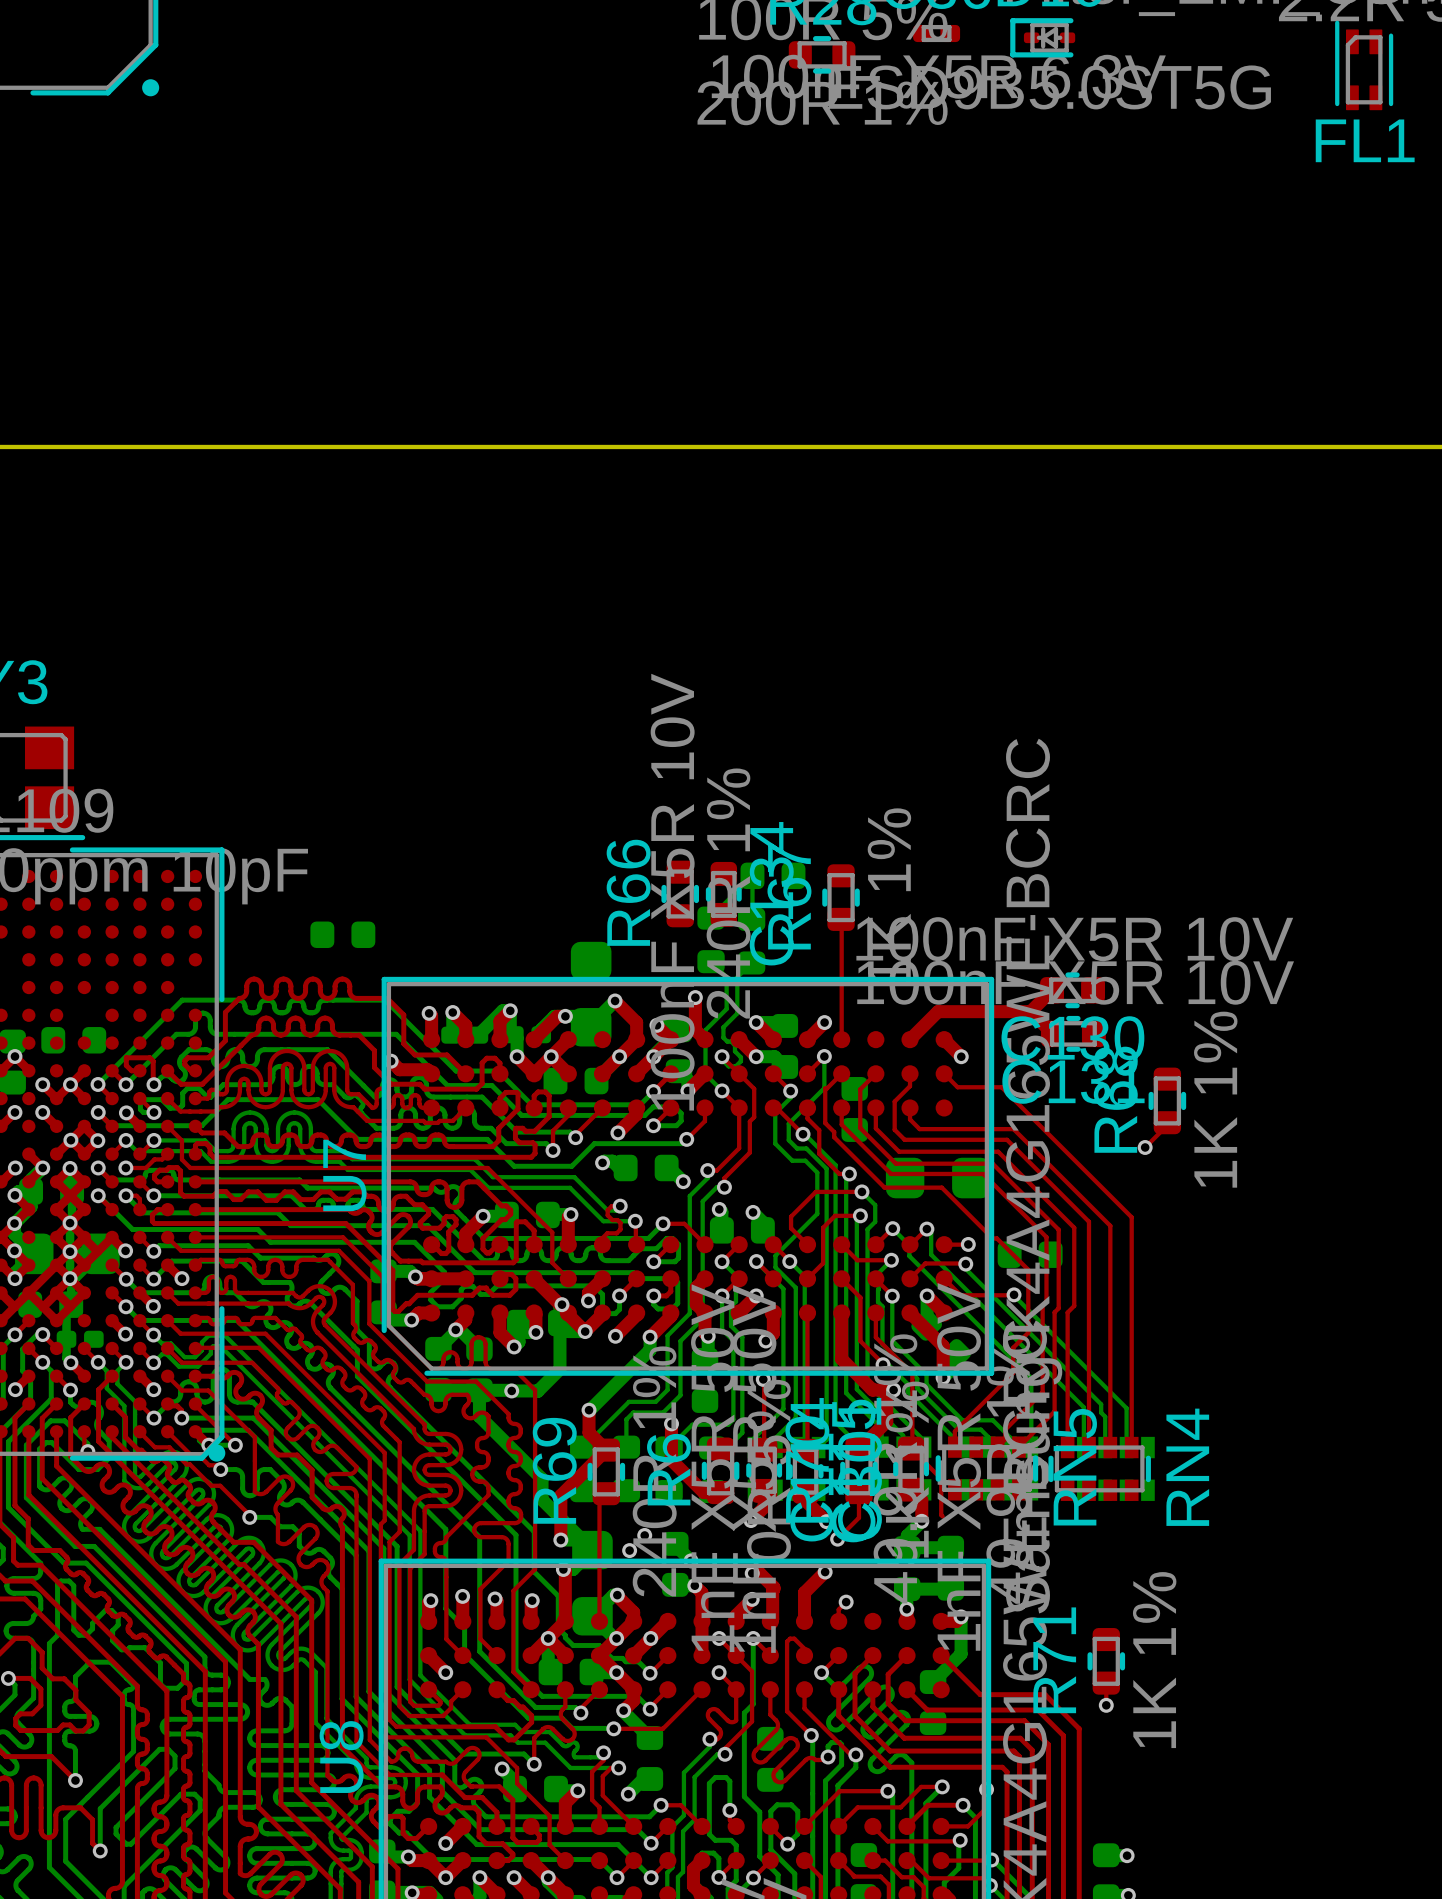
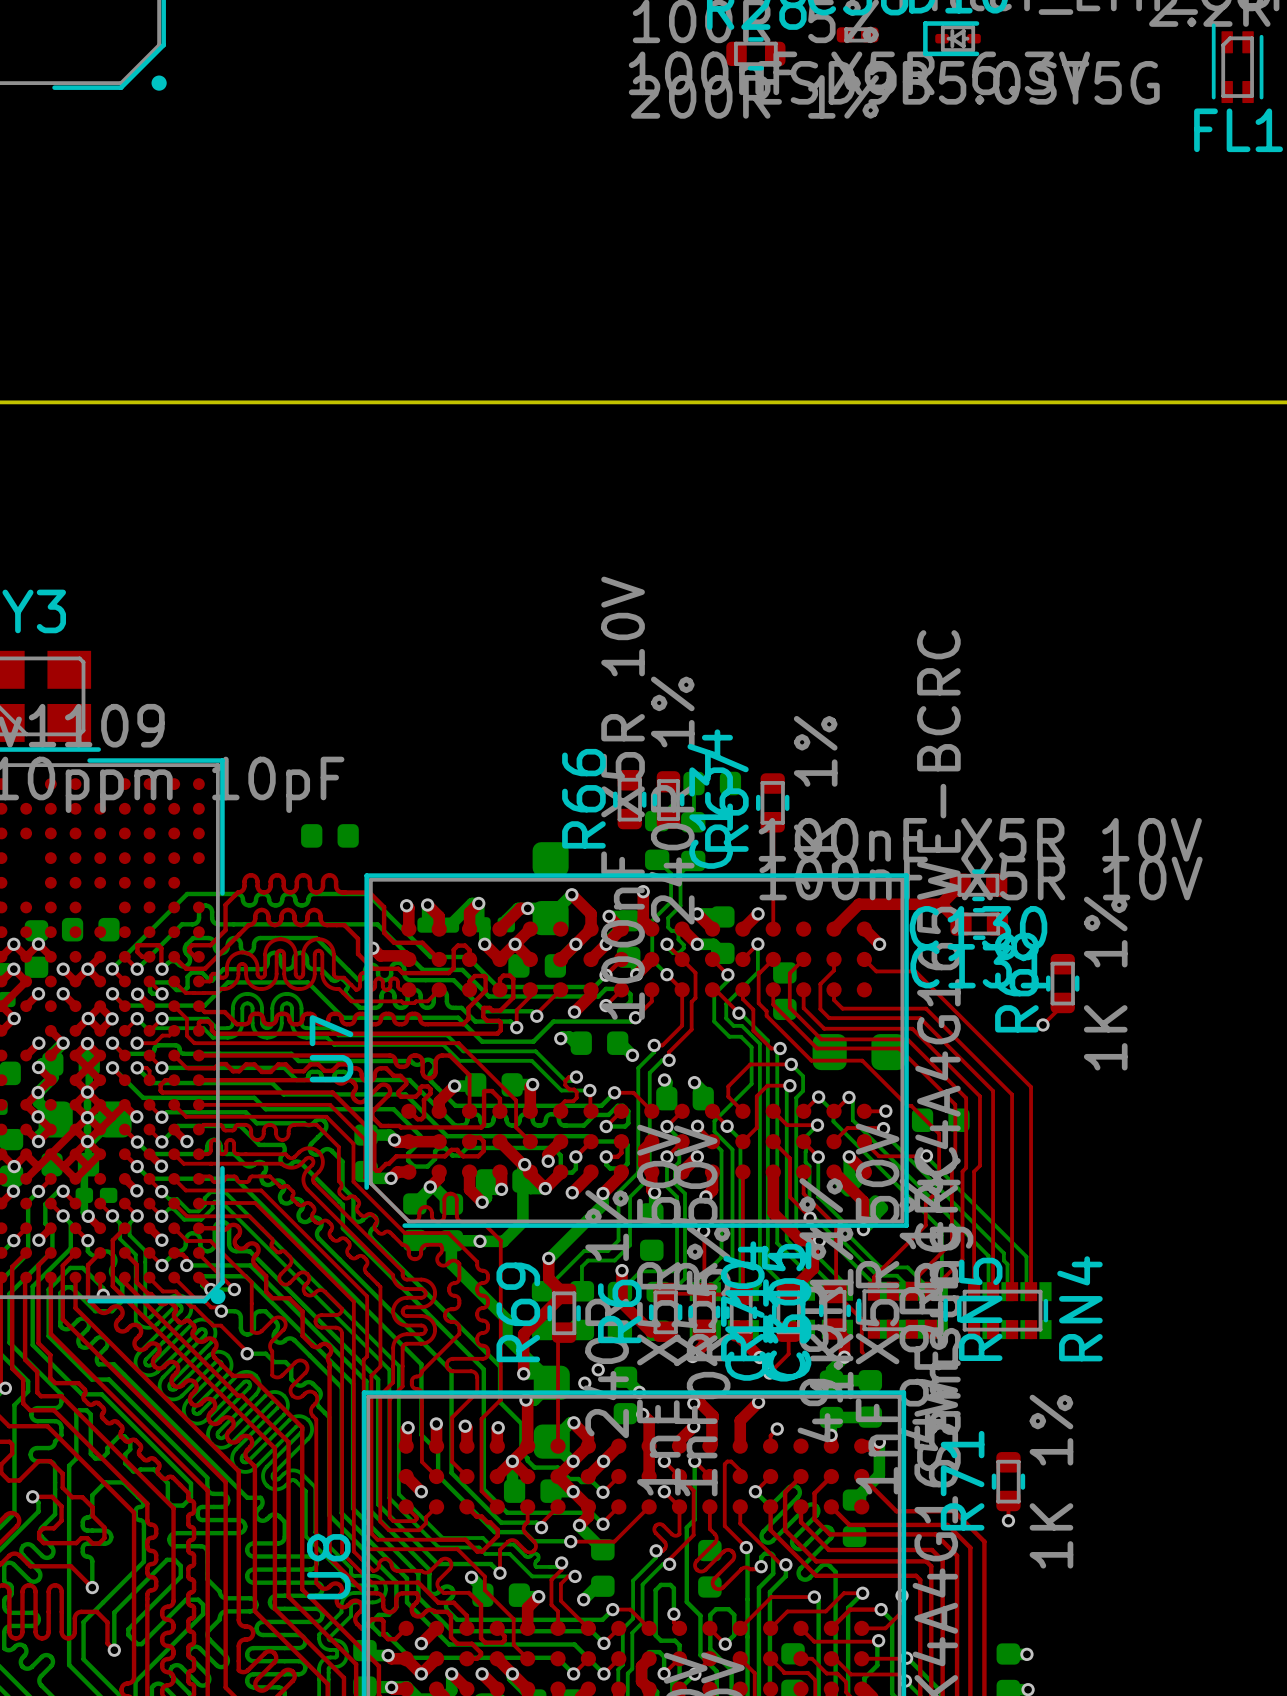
top track: (167, 1181) (157, 1181) (154, 1175) (159, 1170) (177, 1167) (180, 1170) (180, 1192) (184, 1196) -> (174, 1055) (188, 1068)
top track: (499, 1204) (506, 1205) (510, 1210) (510, 1214) (505, 1219) (501, 1219) (482, 1238) (482, 1249) (489, 1252) (499, 1244) -> (469, 1075) (469, 1111)

